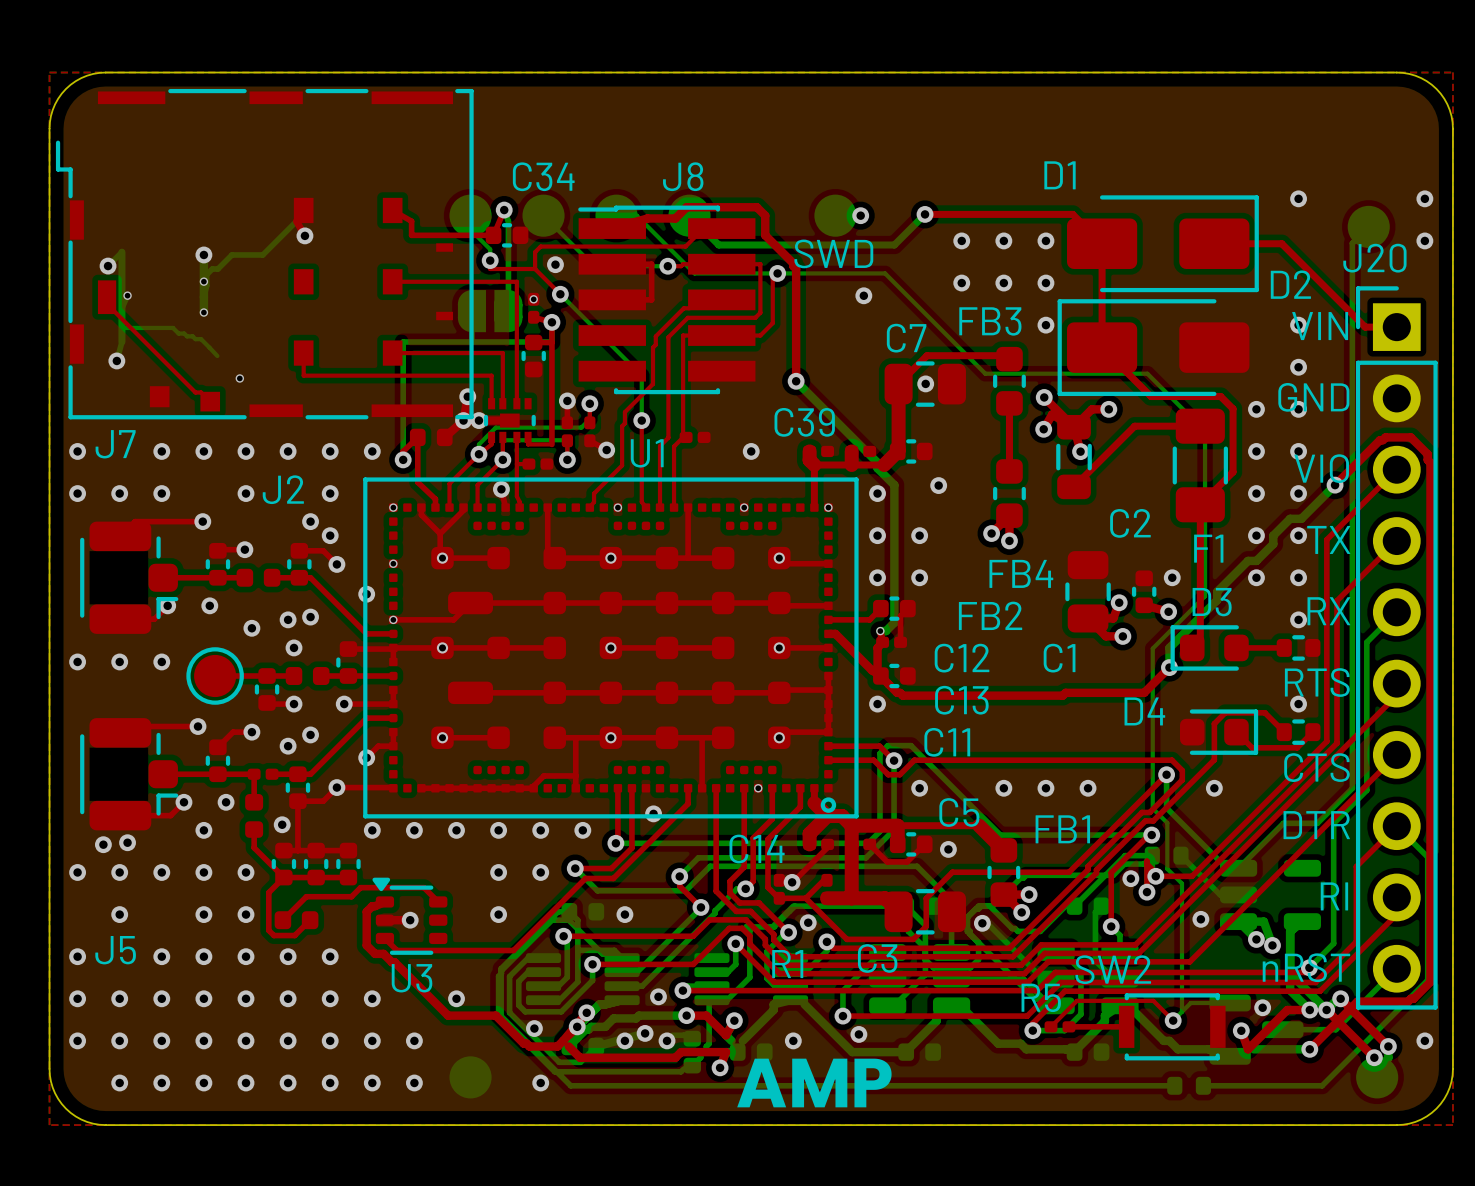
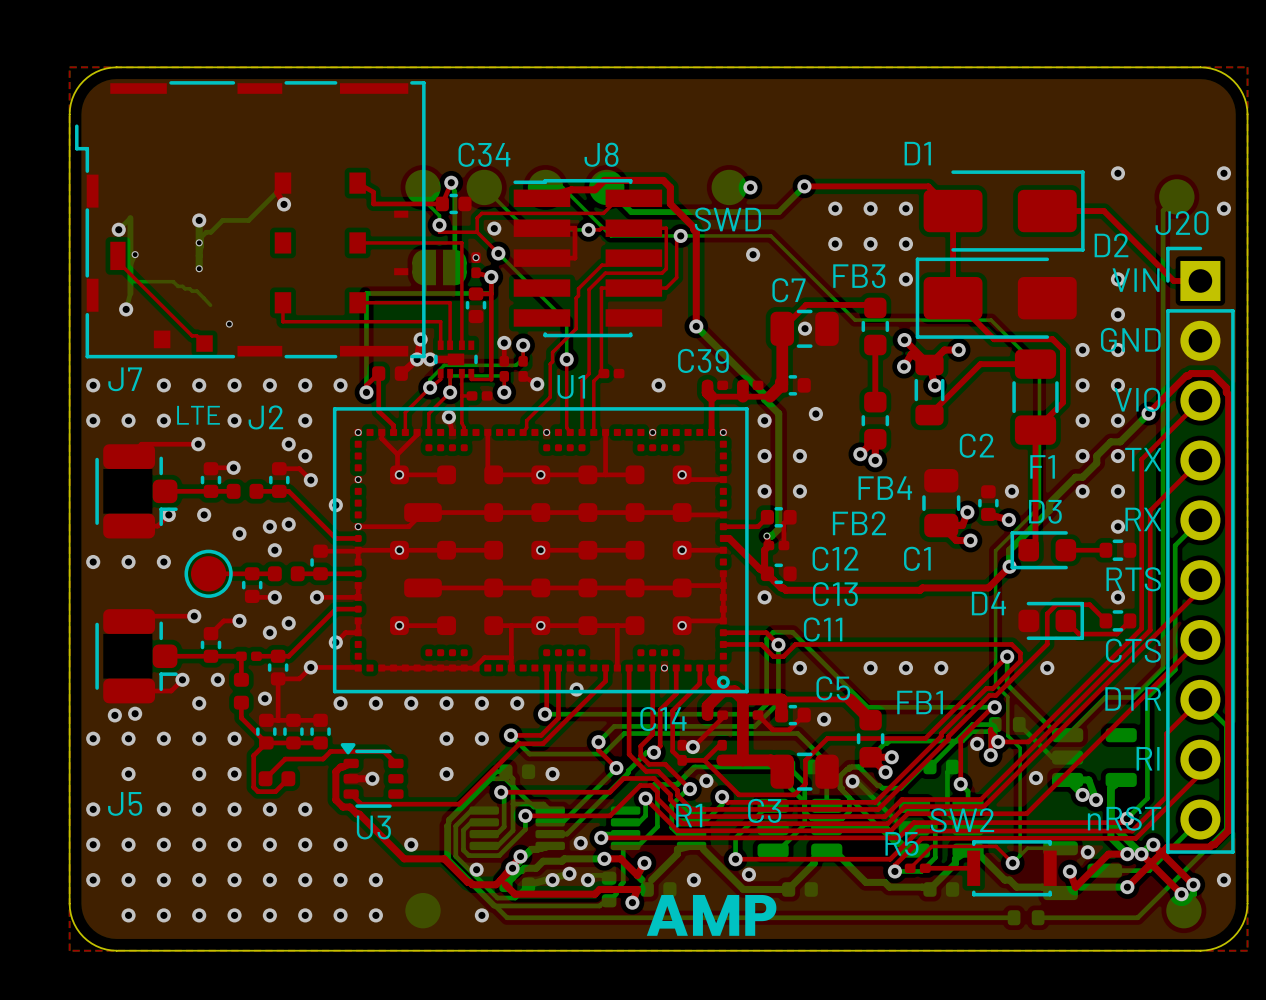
text: none -> LTE (198, 415)

